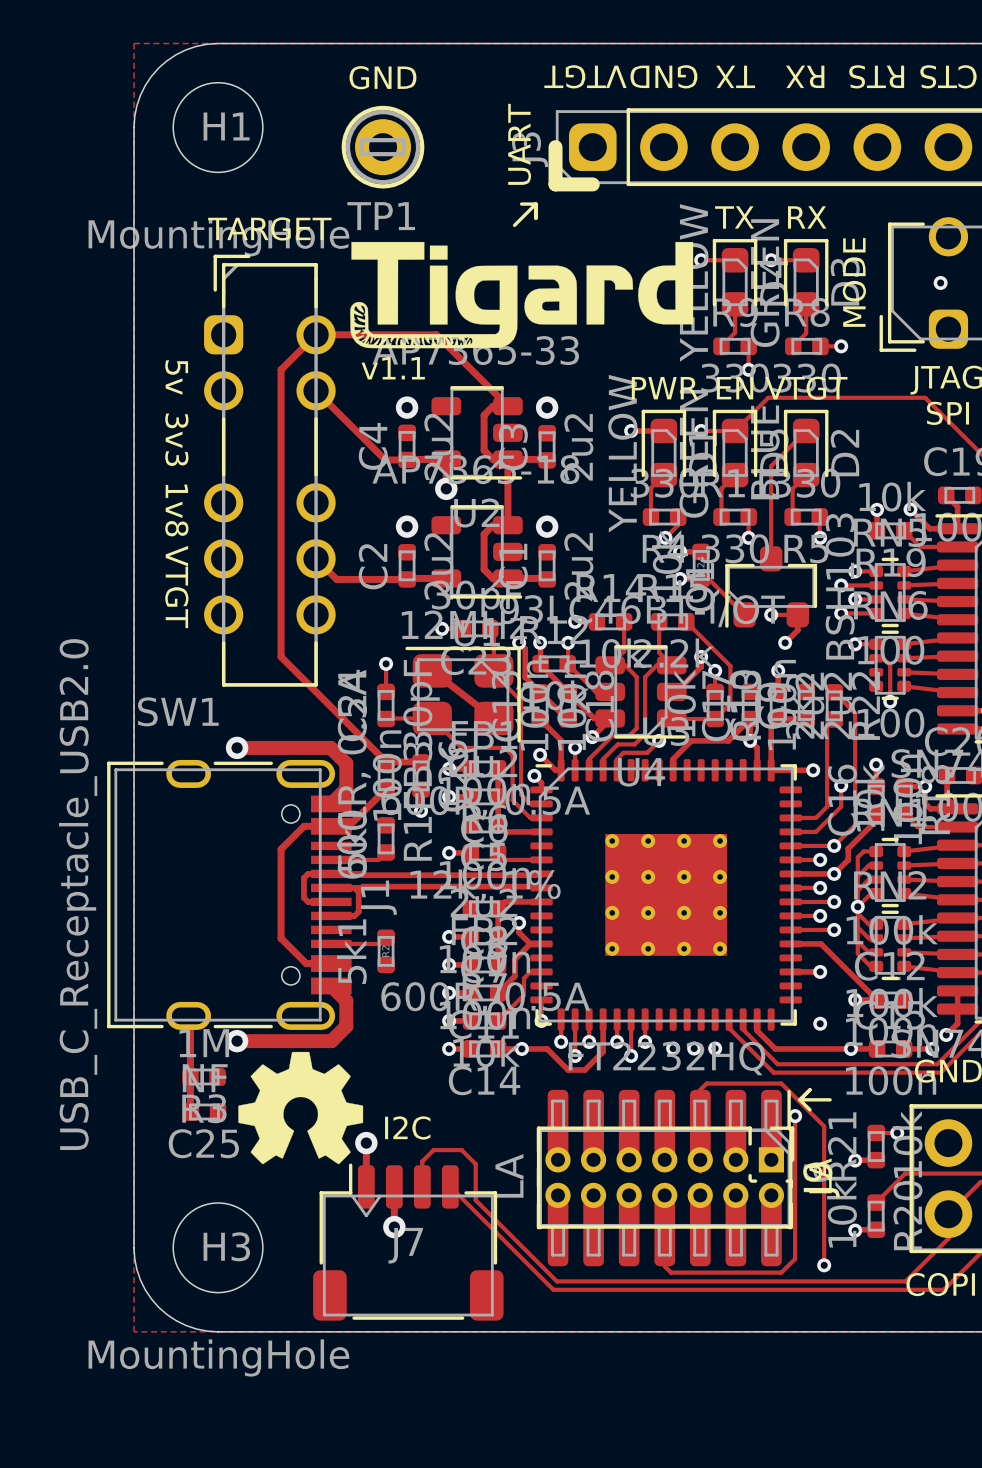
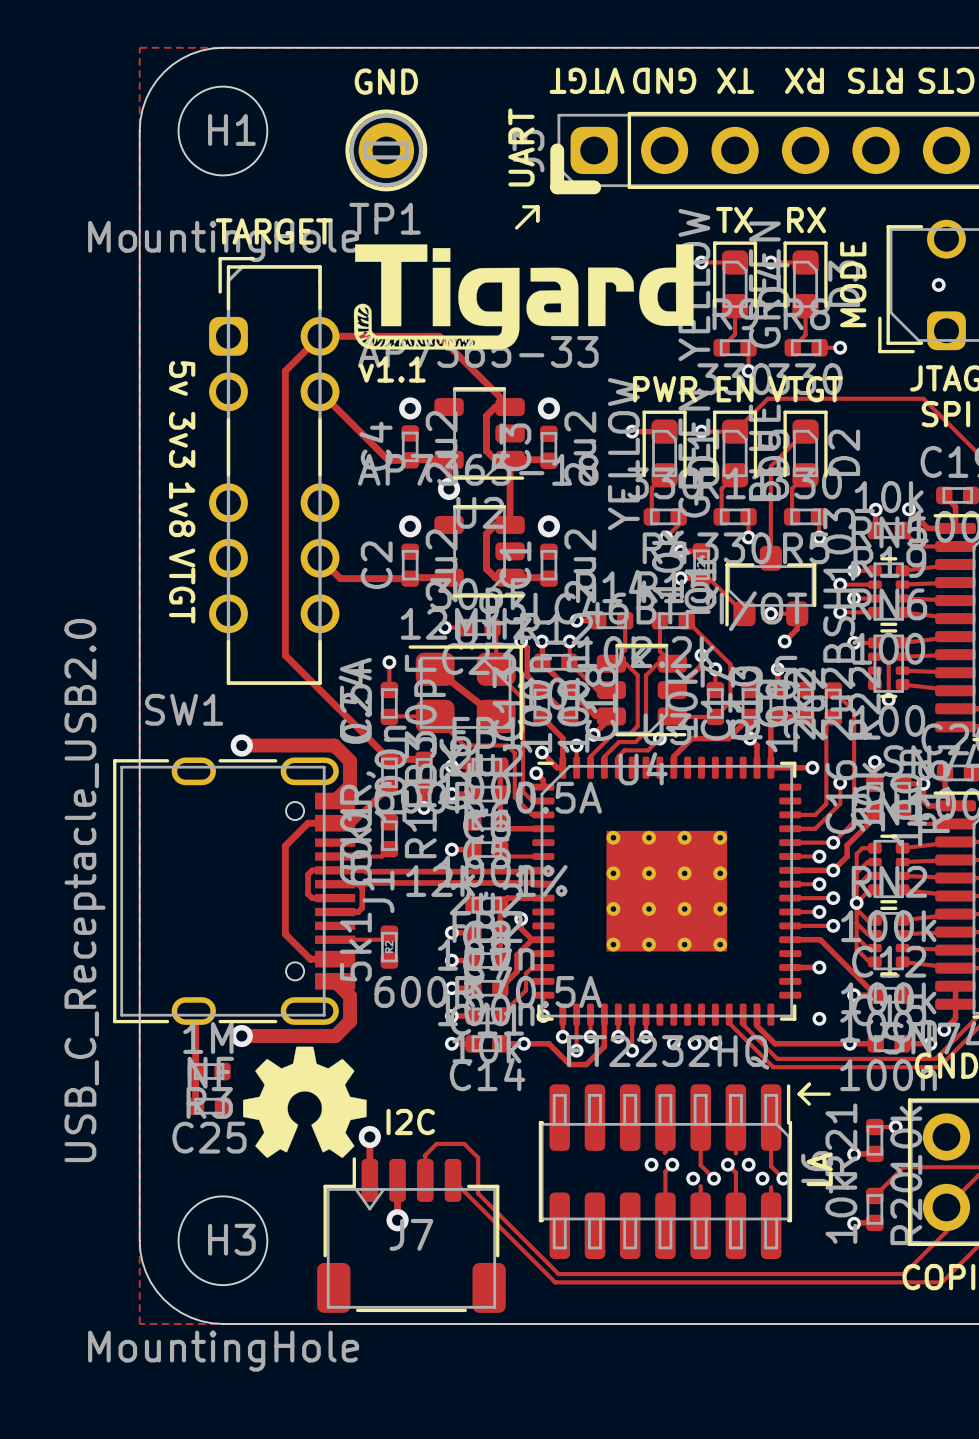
track: (795, 1116) (795, 1258) (781, 1272) (671, 1272) (664, 1266) (664, 1232) -> none
via: (795, 1116) -> none
track: (700, 1123) (700, 1089) (706, 1083) (781, 1083) (824, 1126) (824, 1265) -> none
track: none -> (771, 1153) (771, 1166) (783, 1178)
via: none -> (651, 1164)
track: none -> (672, 1164) (665, 1171) (665, 1188)
via: none -> (672, 1164)
track: none -> (700, 1165) (713, 1178)
track: none -> (727, 1164) (735, 1172) (735, 1188)
via: none -> (727, 1164)
via: none -> (748, 1164)
part: LA (665, 1177) -> none
via: none -> (693, 1178)
via: none -> (713, 1178)
via: none -> (762, 1178)
via: none -> (783, 1178)
via: (824, 1265) -> none

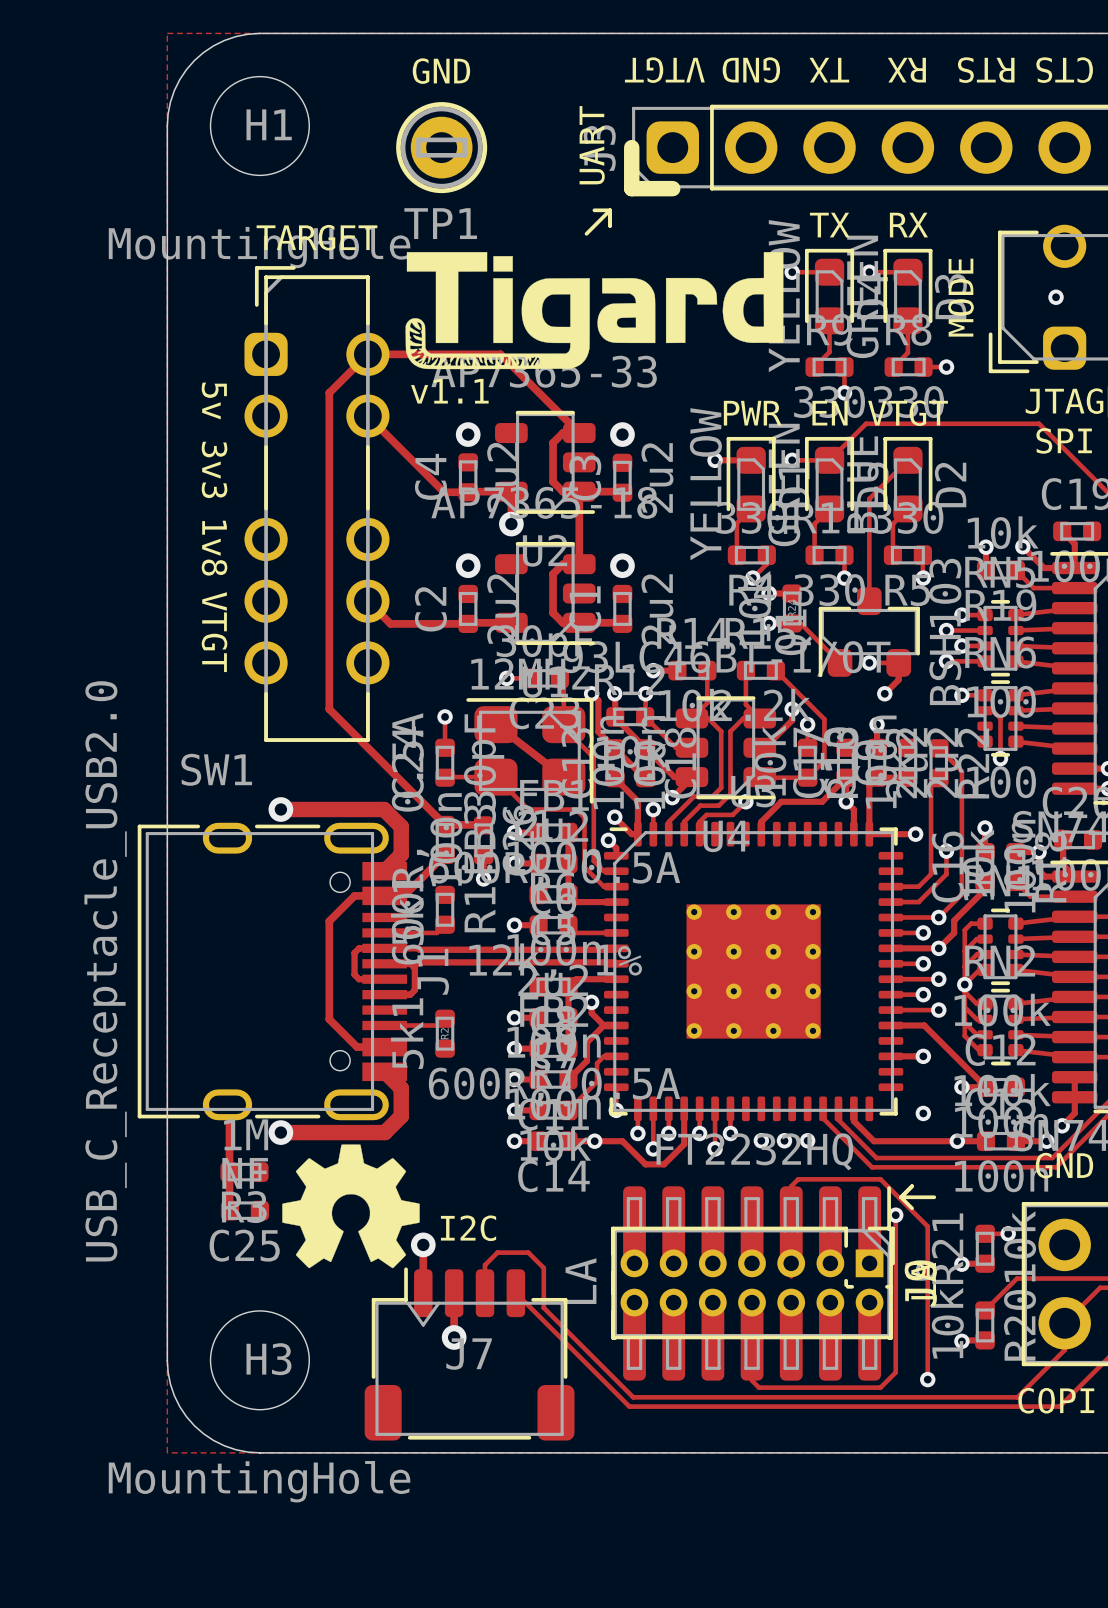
track: none -> (895, 1215) (895, 1372) (880, 1387) (759, 1387) (752, 1380) (752, 1343)
via: none -> (895, 1215)
track: none -> (791, 1223) (791, 1186) (798, 1179) (880, 1179) (927, 1226) (927, 1379)
track: (771, 1153) (771, 1166) (783, 1178) -> none
via: (651, 1164) -> none
track: (672, 1164) (665, 1171) (665, 1188) -> none
via: (672, 1164) -> none
track: (727, 1164) (735, 1172) (735, 1188) -> none
via: (727, 1164) -> none
via: (748, 1164) -> none
track: (700, 1165) (713, 1178) -> none
part: none -> LA (753, 1282)
via: (693, 1178) -> none
via: (713, 1178) -> none
via: (762, 1178) -> none
via: (783, 1178) -> none
via: none -> (927, 1379)

